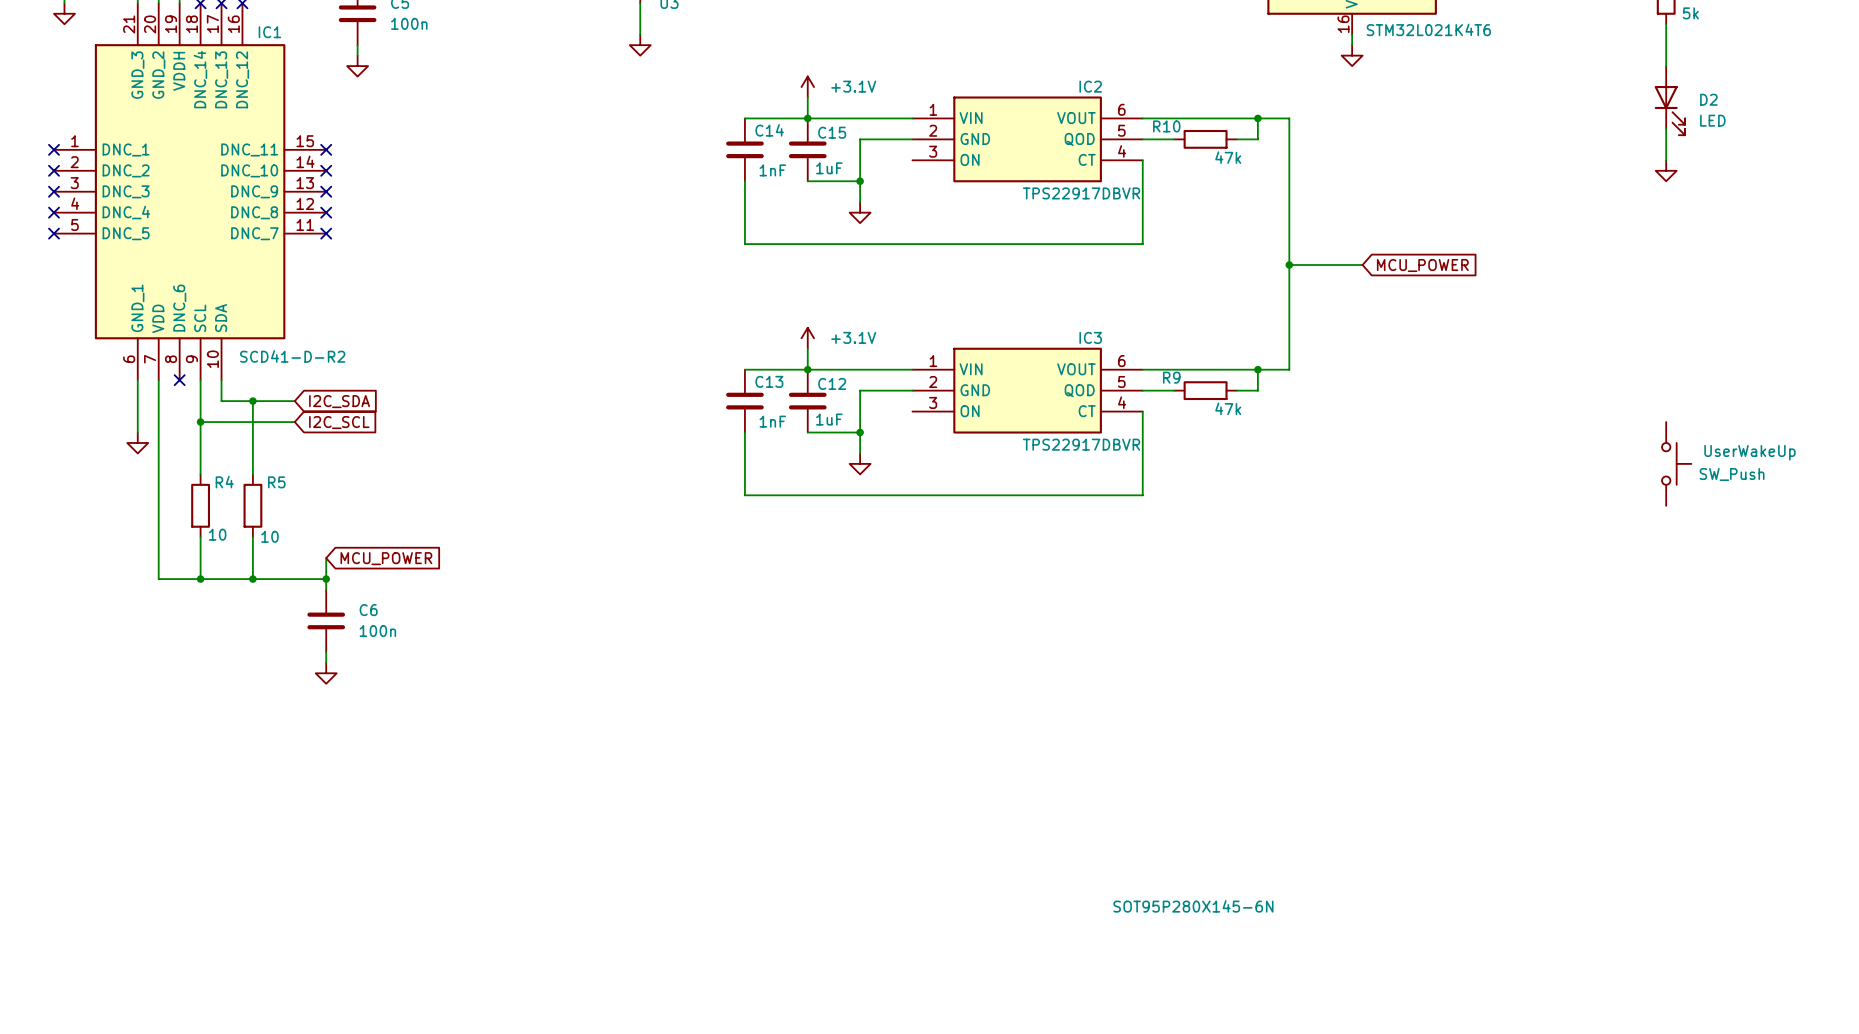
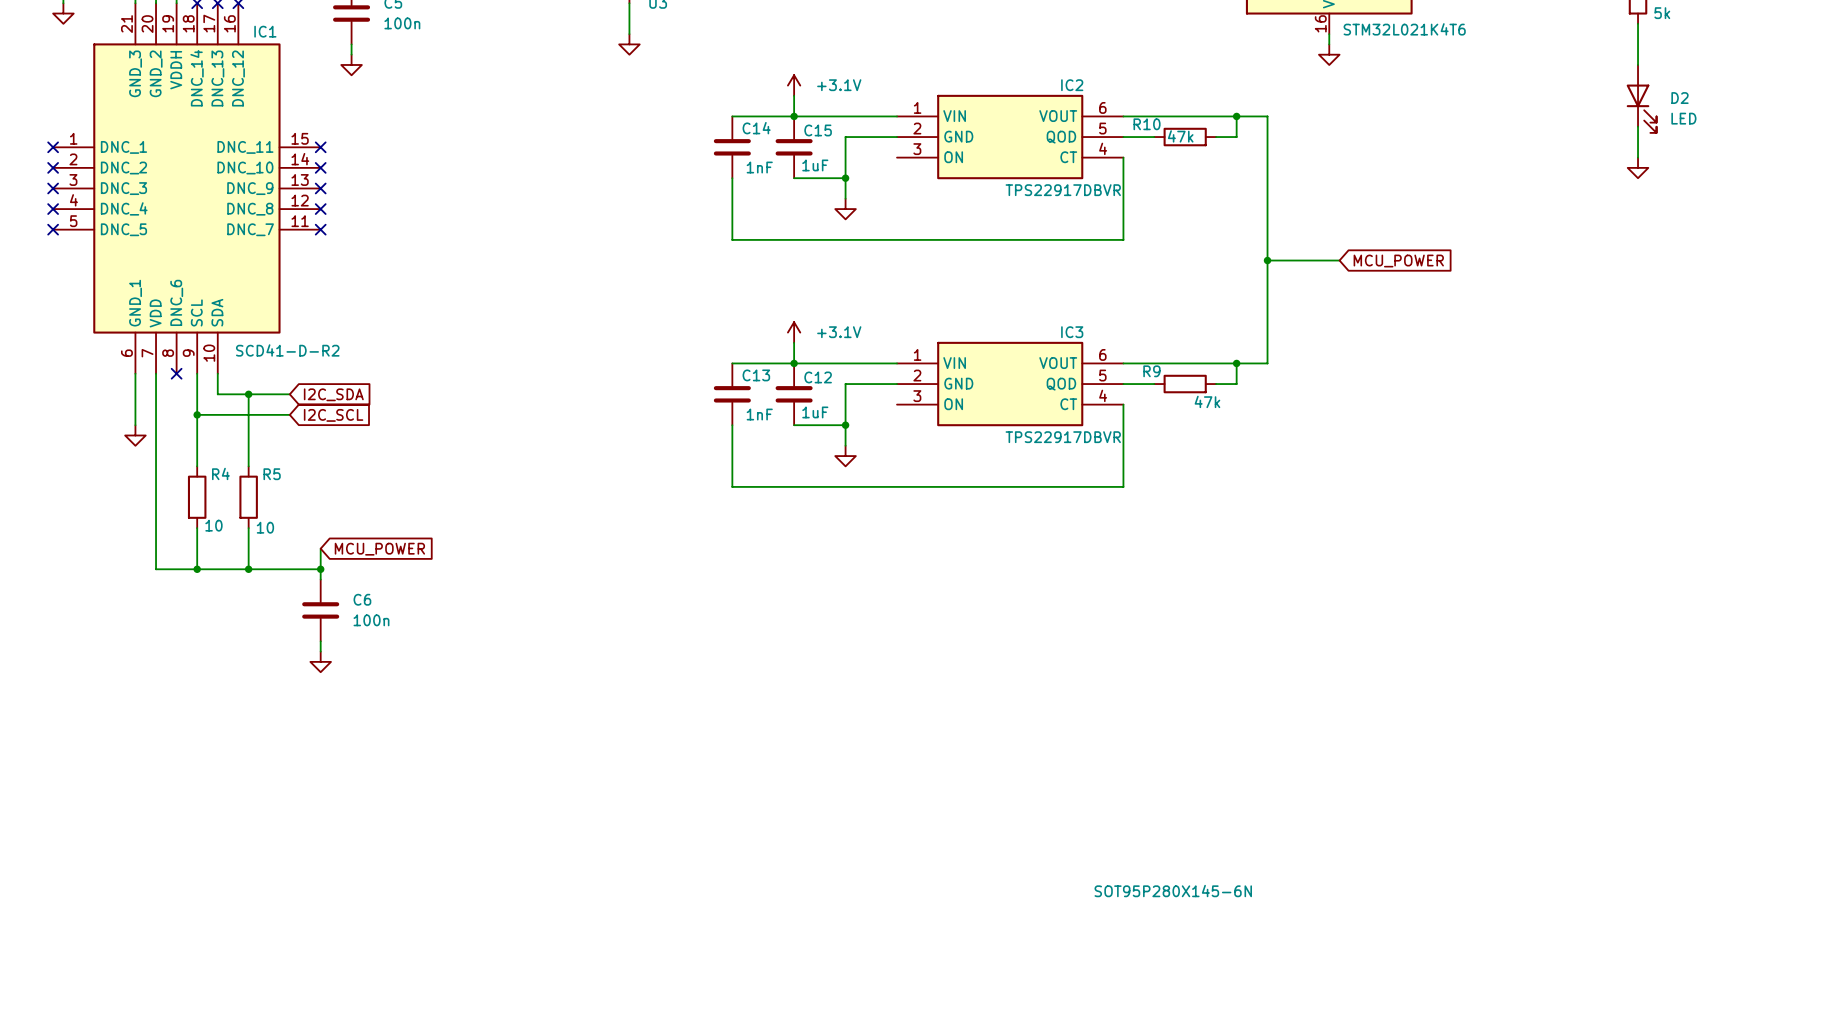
R10 value position: 47k (1228, 157) -> 47k (1180, 136)
UserWakeUp: SW_Push (1676, 463) -> none

